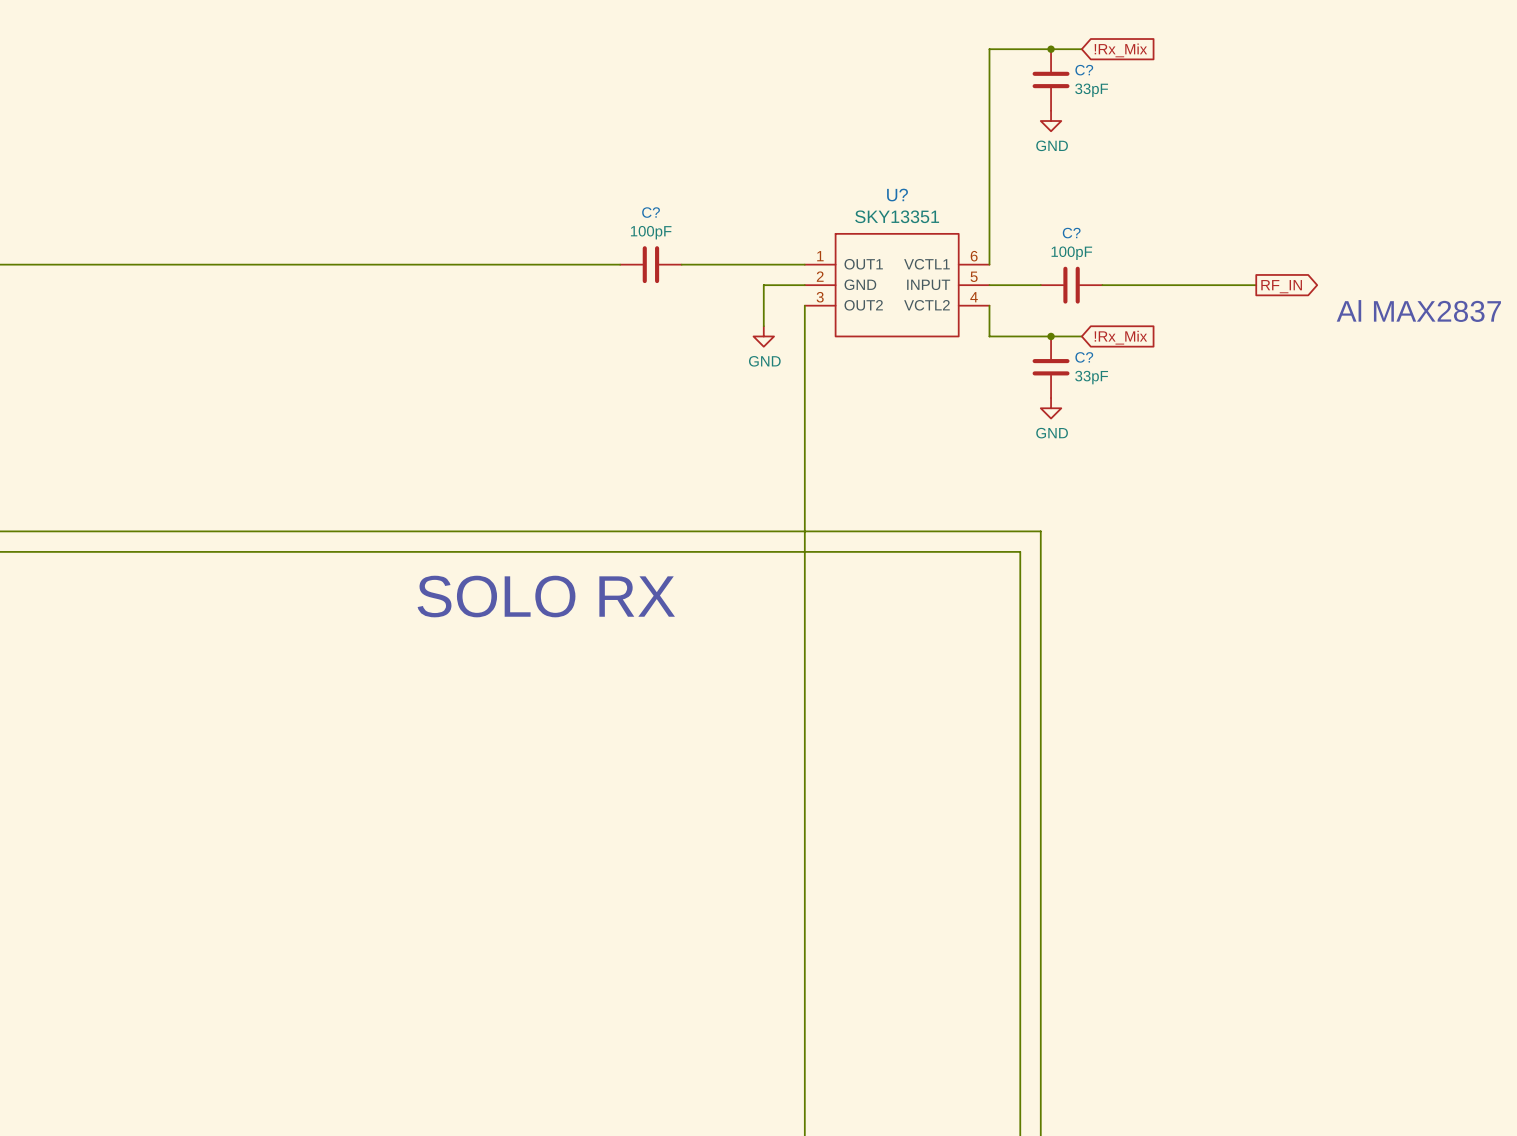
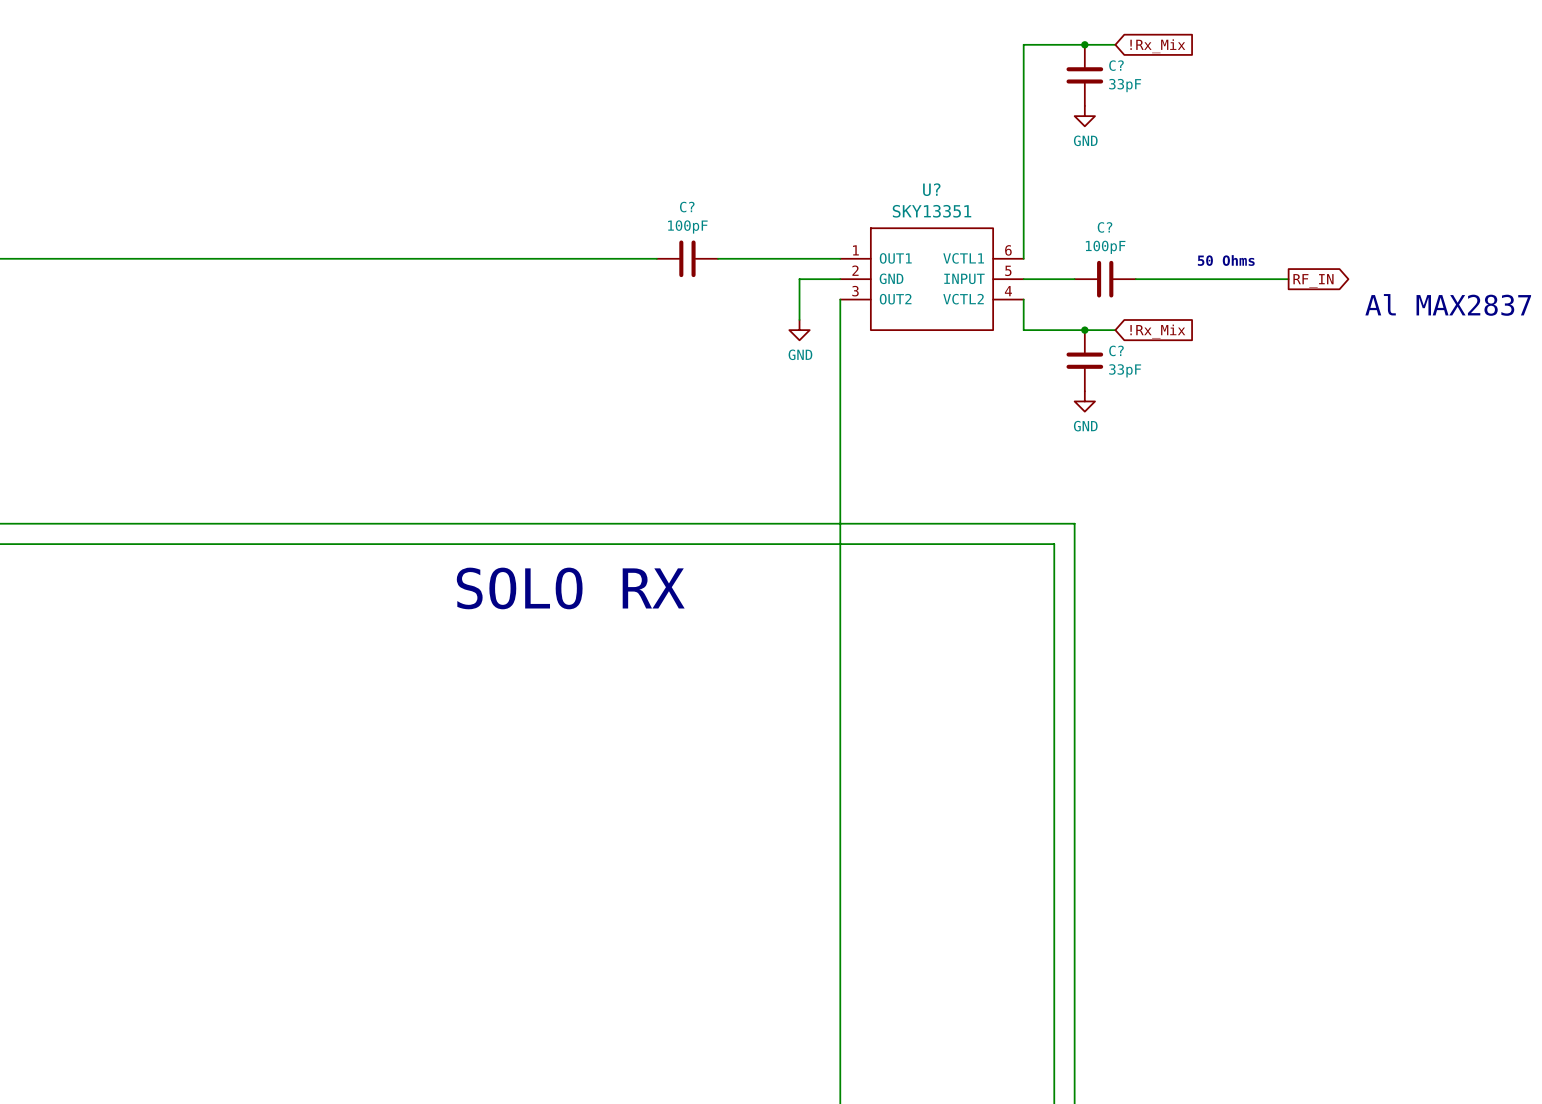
text: none -> 50 Ohms (1226, 260)

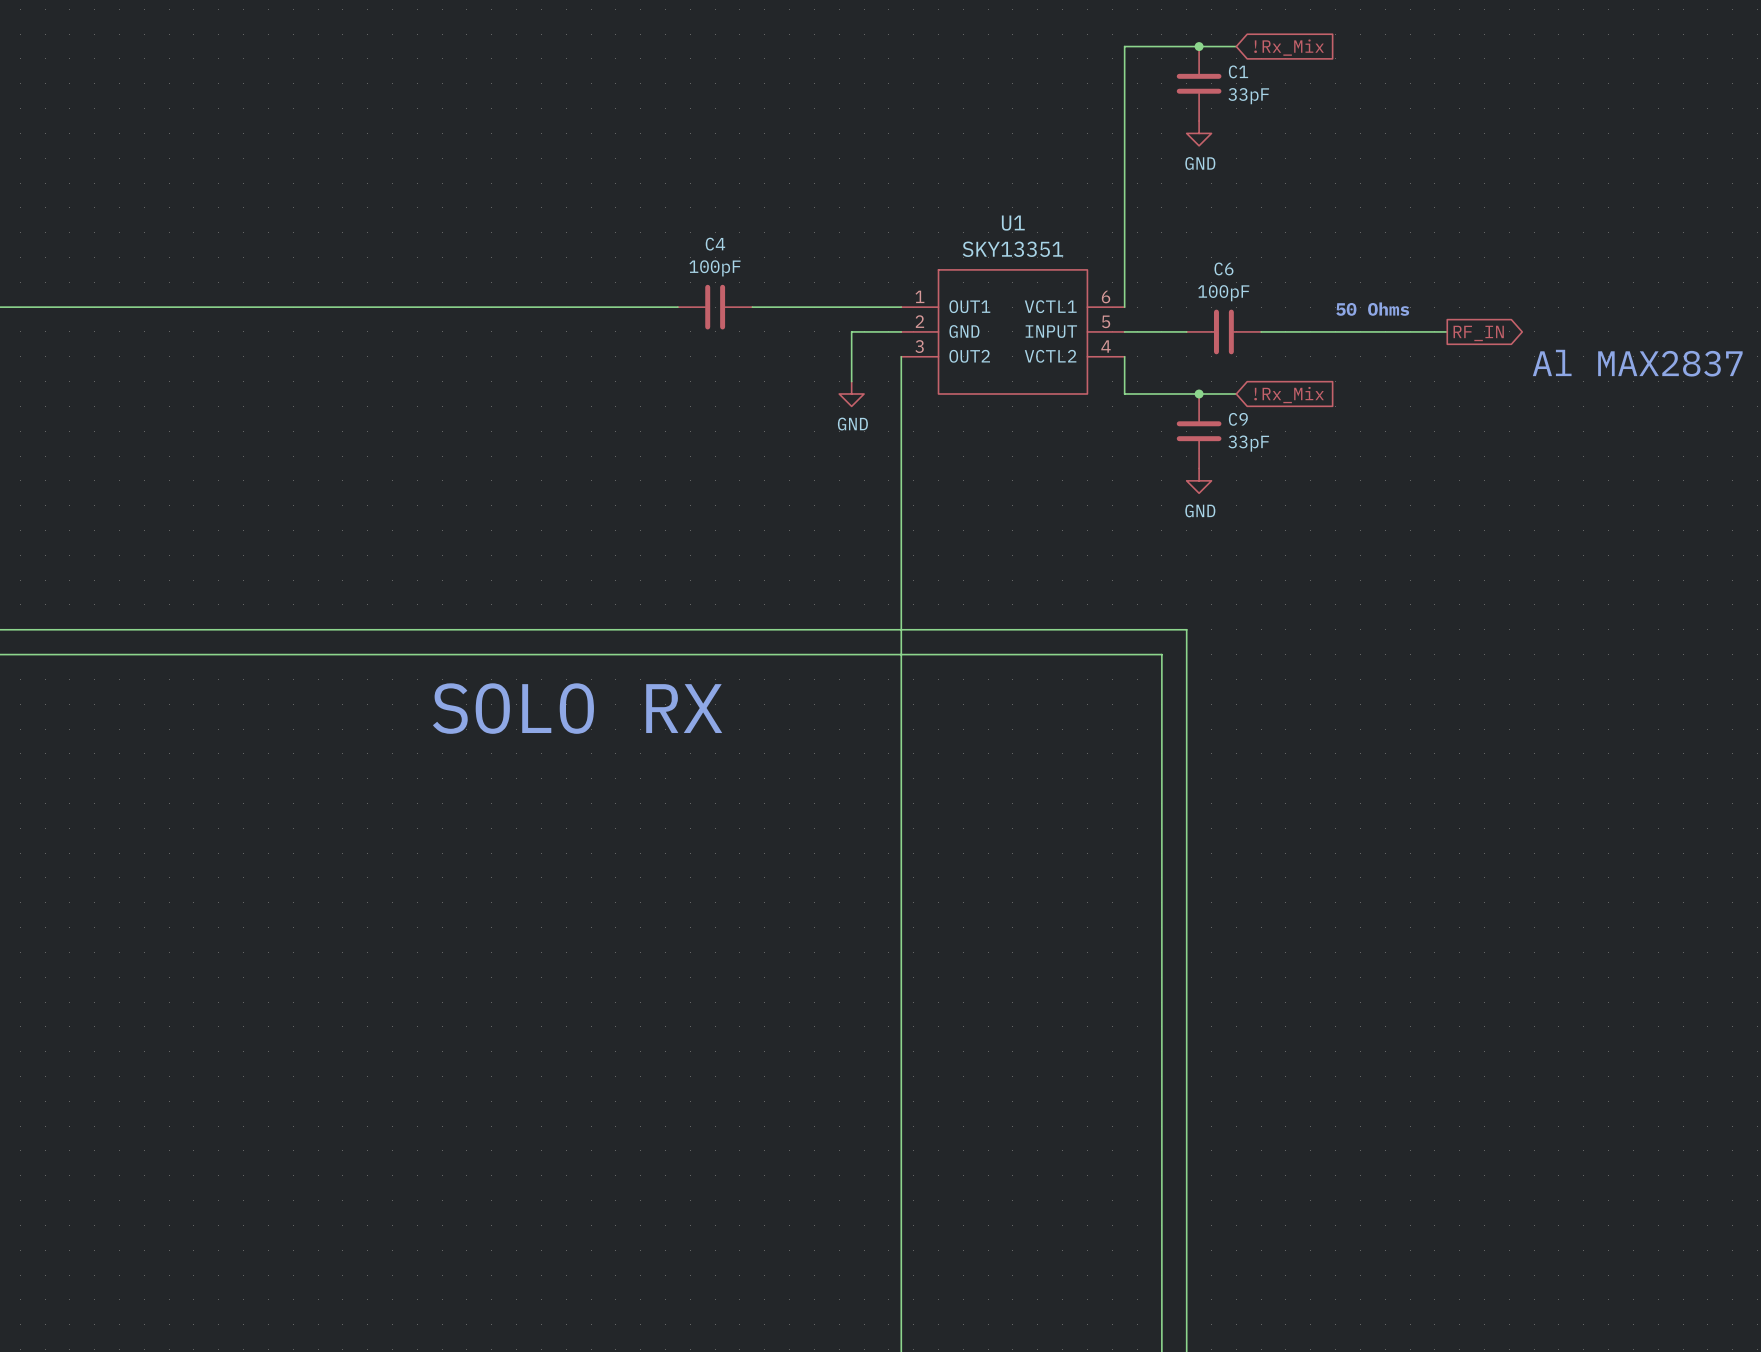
C? name: C? (1116, 65) -> C1 (1238, 71)
U? name: U? (931, 189) -> U1 (1013, 223)
C? name: C? (687, 207) -> C4 (715, 244)
C? name: C? (1105, 227) -> C6 (1223, 268)
C? name: C? (1116, 350) -> C9 (1238, 419)

